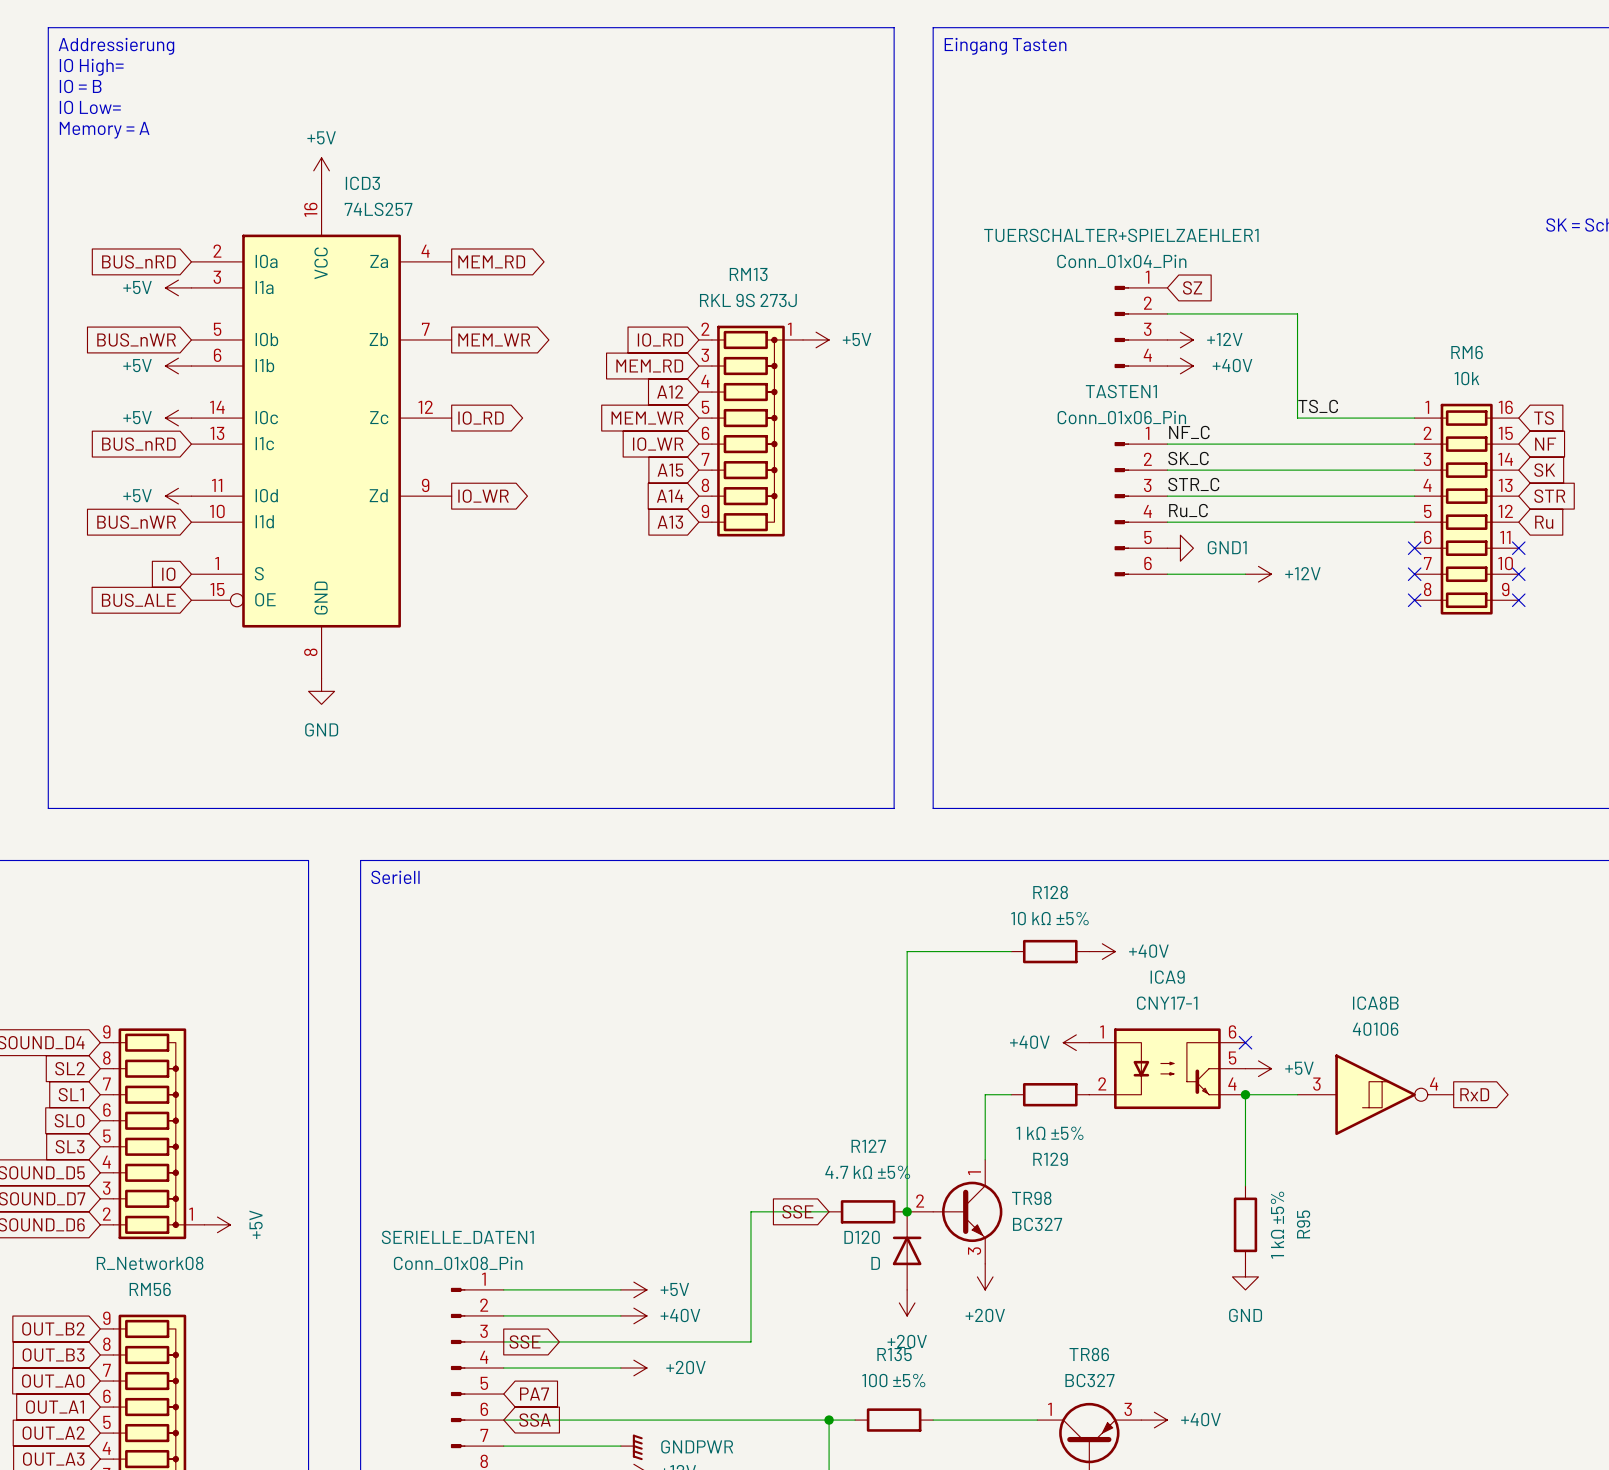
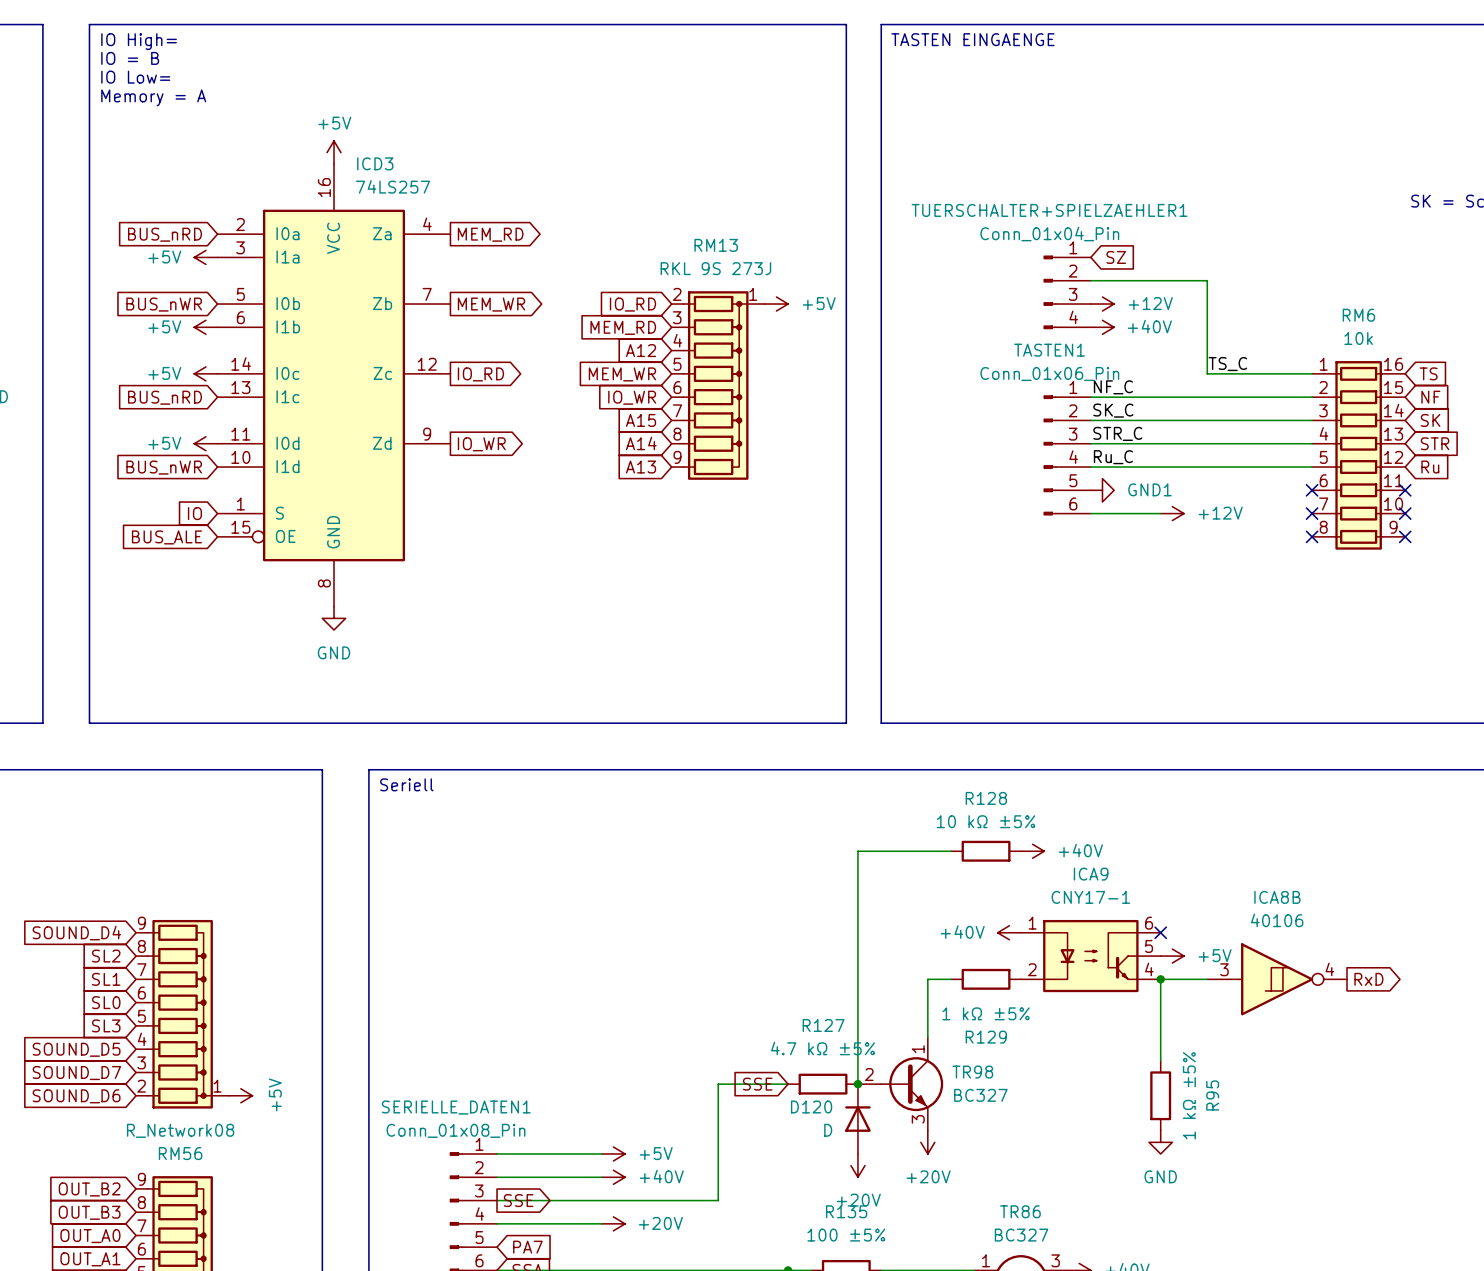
text: Addressierung (116, 46) -> IO High= (139, 41)
text: Eingang Tasten (1005, 46) -> TASTEN EINGAENGE (972, 39)
text: IO High= (91, 67) -> IO = B (130, 58)
text: IO = B (80, 86) -> IO Low= (135, 77)
text: IO Low= (90, 107) -> Memory = A (153, 97)
text: Memory = A (104, 130) -> none

